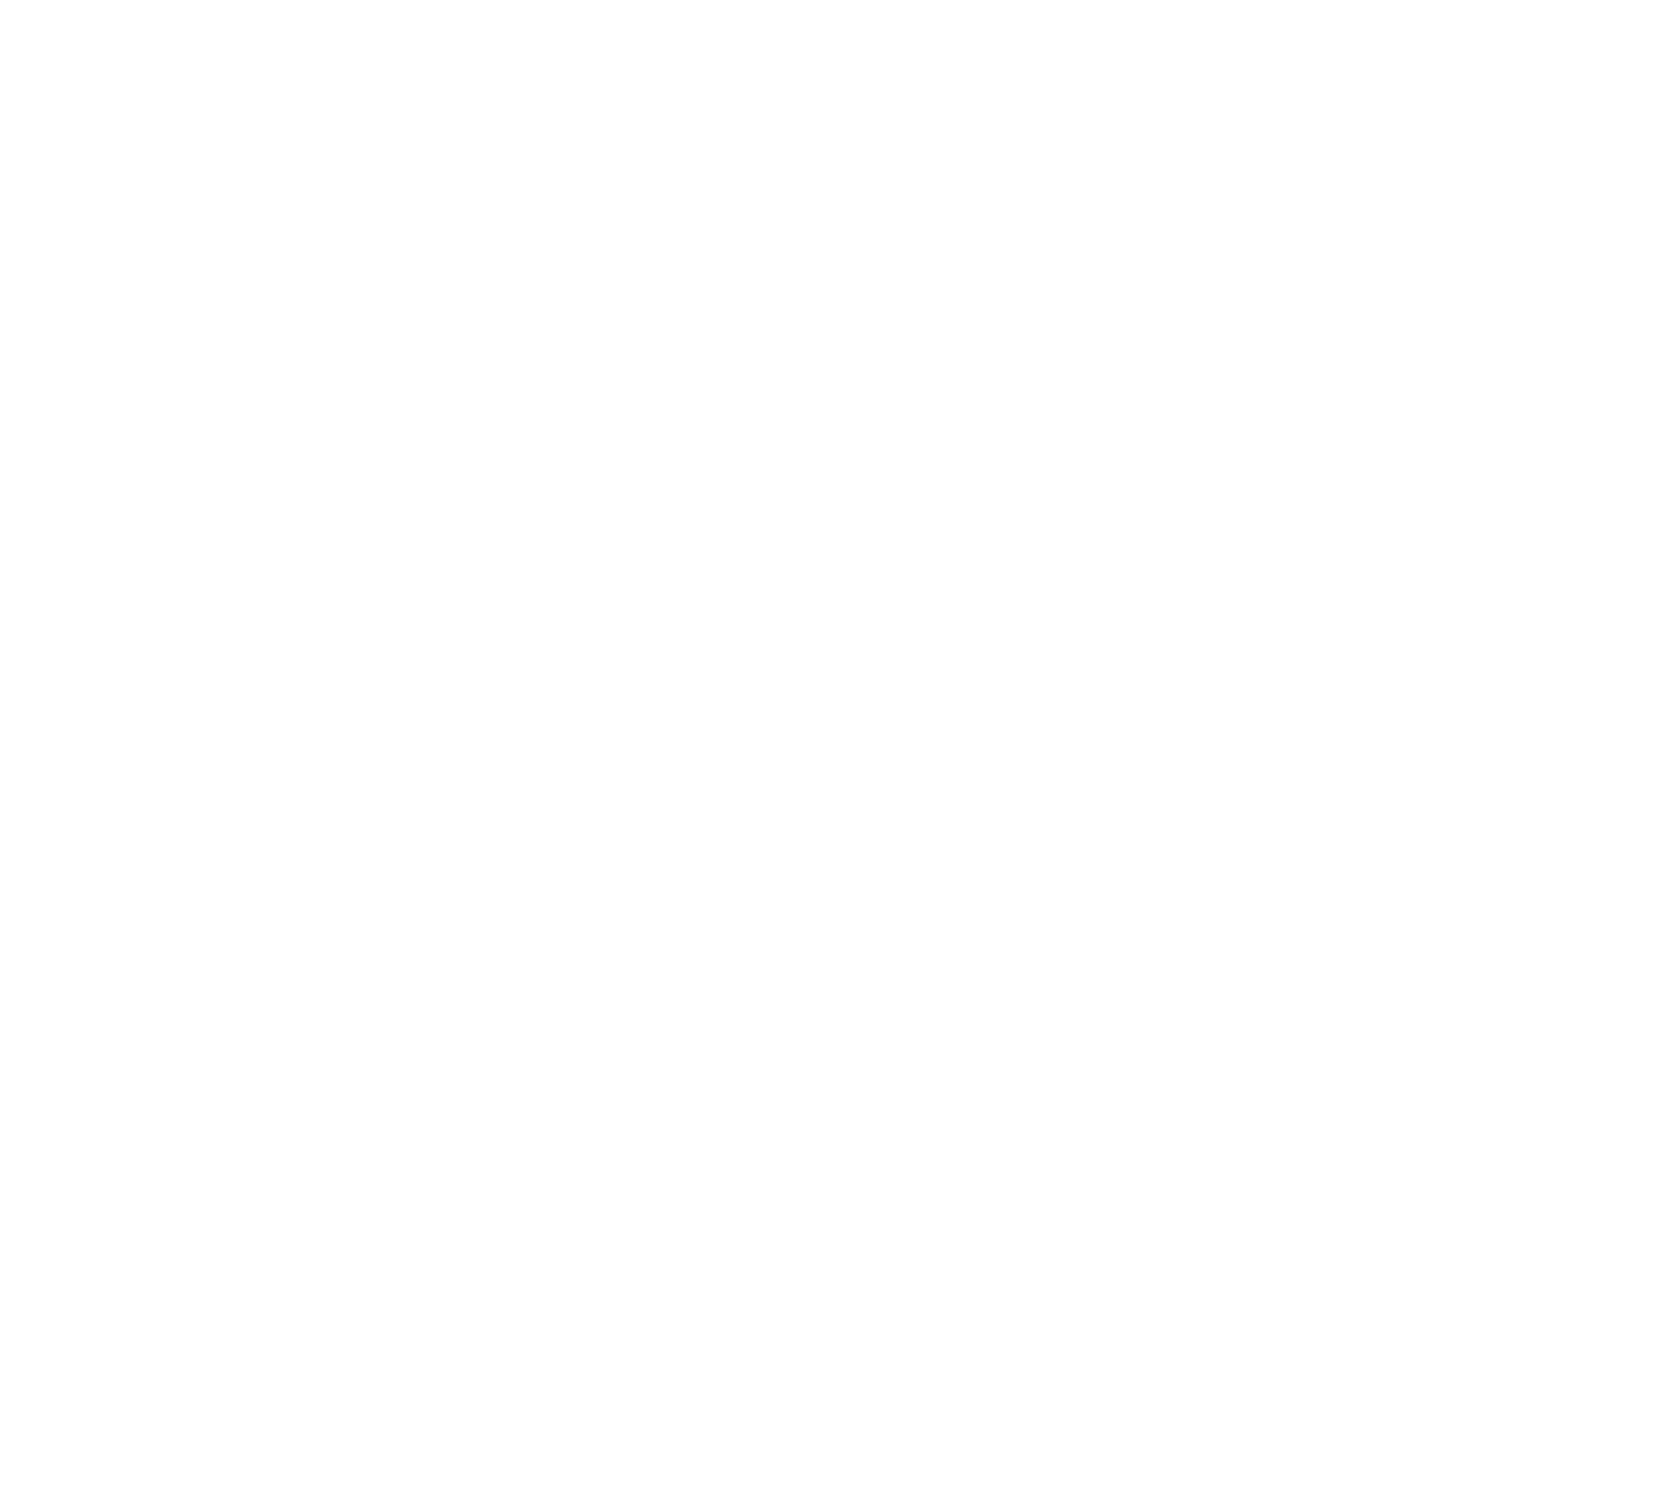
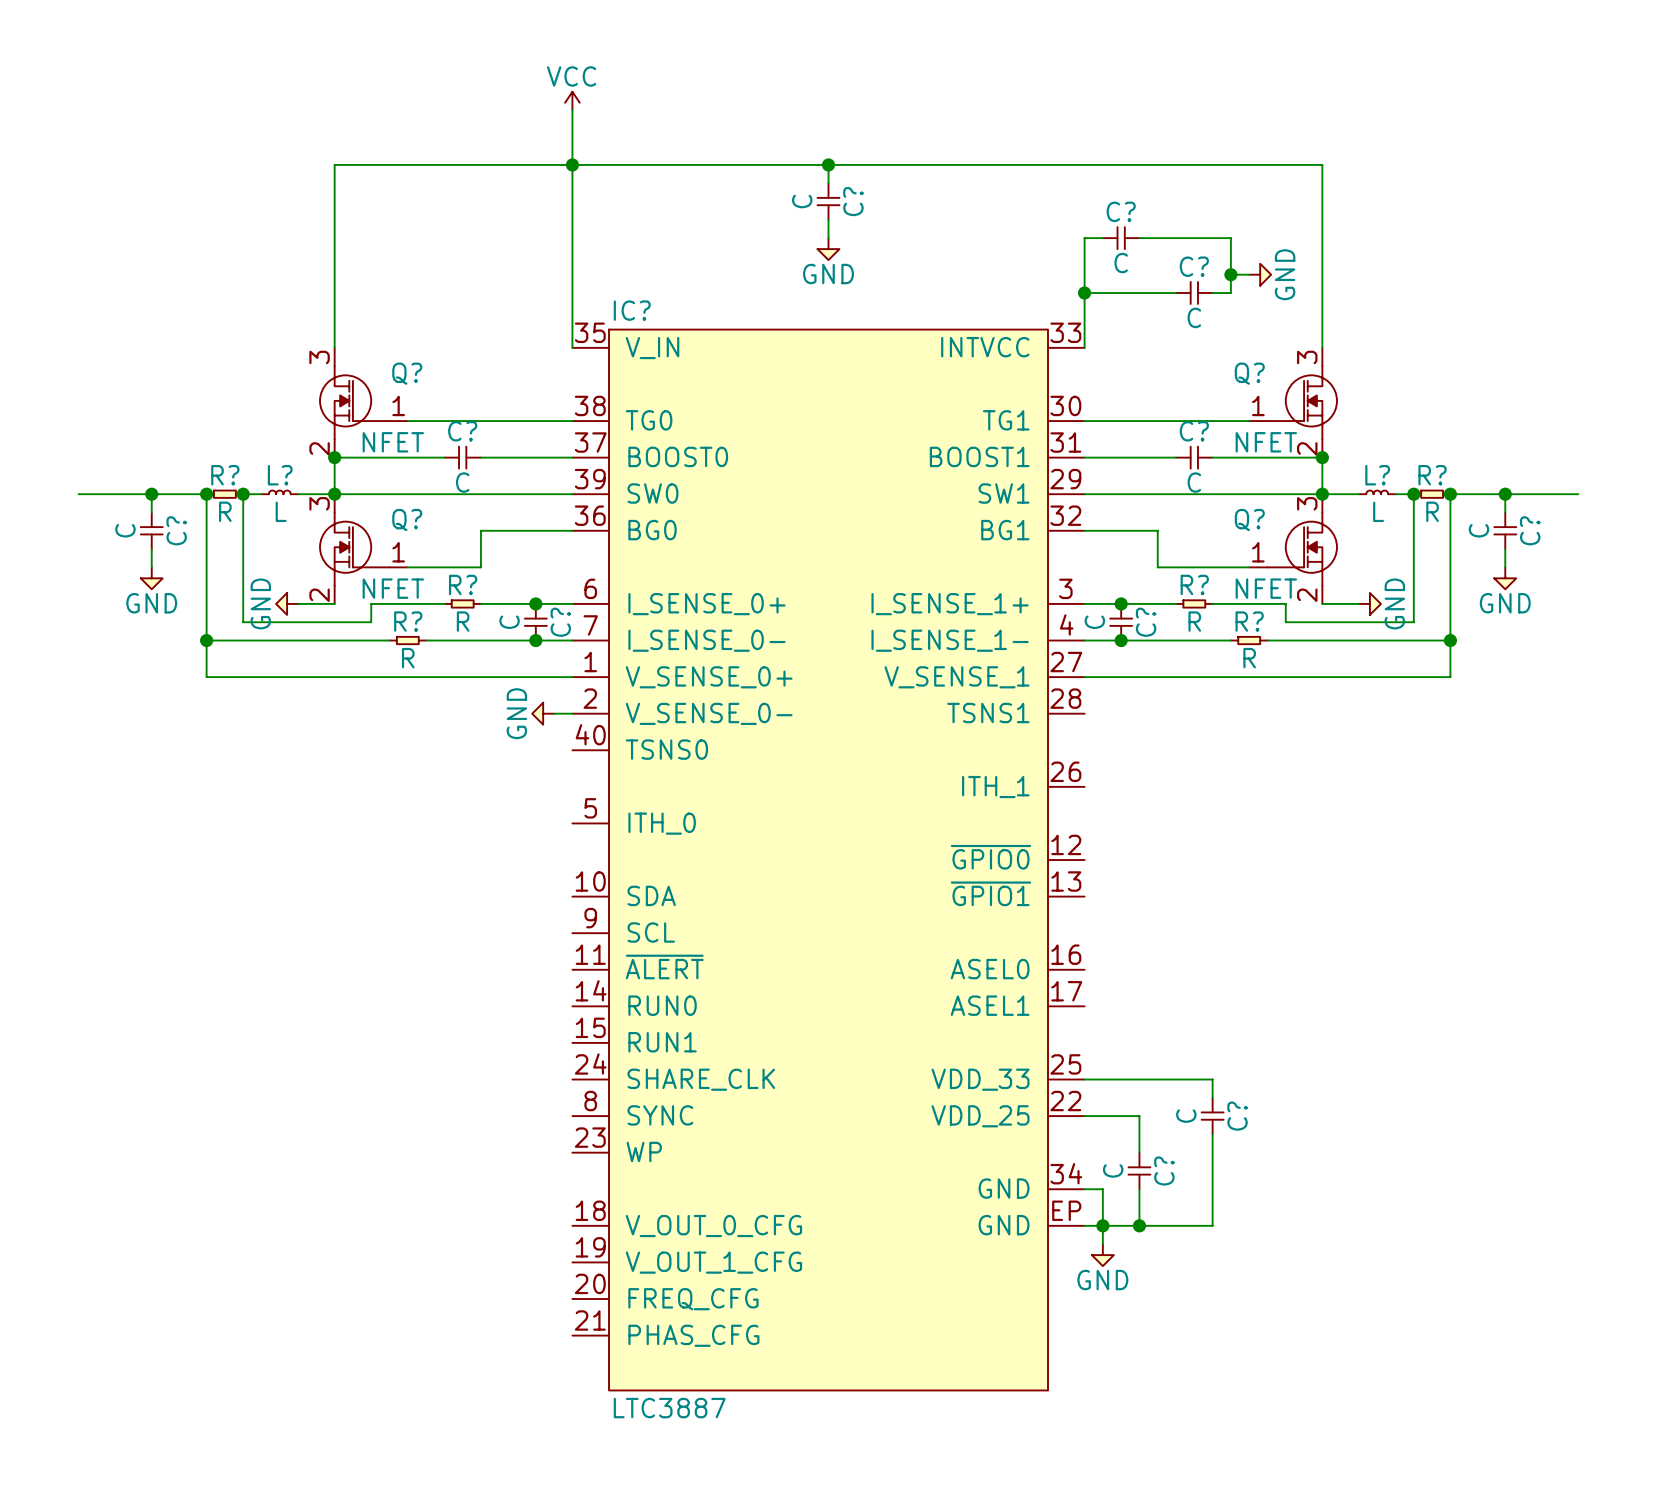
power symbol: none -> VCC (572, 100)
wire: none -> (572, 110) (572, 347)
junction: none -> (572, 164)
wire: none -> (828, 164) (828, 183)
junction: none -> (828, 164)
C?: none -> C (828, 201)
wire: none -> (828, 219) (828, 238)
wire: none -> (1102, 238) (1084, 238) (1084, 347)
C?: none -> C (1121, 238)
wire: none -> (1139, 238) (1230, 238) (1230, 293) (1212, 293)
power symbol: none -> GND (828, 249)
wire: none -> (1230, 274) (1249, 274)
junction: none -> (1230, 274)
power symbol: none -> GND (1260, 274)
wire: none -> (1084, 293) (1176, 293)
junction: none -> (1084, 293)
C?: none -> C (1194, 293)
wire: none -> (334, 347) (334, 164) (1322, 164) (1322, 347)
Q?: none -> NFET (363, 402)
Q?: none -> NFET (1293, 402)
wire: none -> (407, 421) (572, 421)
wire: none -> (1084, 421) (1249, 421)
junction: none -> (334, 457)
wire: none -> (444, 457) (334, 457) (334, 494)
C?: none -> C (462, 457)
wire: none -> (480, 457) (572, 457)
wire: none -> (1084, 457) (1176, 457)
C?: none -> C (1194, 457)
wire: none -> (1212, 457) (1322, 457) (1322, 494)
junction: none -> (1322, 457)
L?: none -> L (279, 492)
L?: none -> L (1377, 492)
wire: none -> (78, 494) (206, 494) (206, 677) (572, 677)
wire: none -> (151, 494) (151, 512)
junction: none -> (151, 494)
junction: none -> (206, 494)
R?: none -> R (224, 494)
junction: none -> (243, 494)
wire: none -> (261, 494) (243, 494) (243, 622) (371, 622) (371, 603) (444, 603)
wire: none -> (298, 494) (572, 494)
junction: none -> (334, 494)
wire: none -> (1084, 494) (1358, 494)
junction: none -> (1322, 494)
wire: none -> (1395, 494) (1413, 494) (1413, 622) (1285, 622) (1285, 603) (1212, 603)
junction: none -> (1413, 494)
R?: none -> R (1432, 494)
junction: none -> (1450, 494)
wire: none -> (1505, 494) (1505, 512)
junction: none -> (1505, 494)
wire: none -> (1578, 494) (1450, 494) (1450, 677) (1084, 677)
C?: none -> C (151, 530)
wire: none -> (572, 530) (480, 530) (480, 567) (407, 567)
wire: none -> (1084, 530) (1157, 530) (1157, 567) (1249, 567)
C?: none -> C (1505, 530)
wire: none -> (151, 549) (151, 567)
Q?: none -> NFET (363, 549)
Q?: none -> NFET (1293, 549)
wire: none -> (1505, 549) (1505, 567)
power symbol: none -> GND (151, 578)
power symbol: none -> GND (1505, 578)
power symbol: none -> GND (287, 603)
wire: none -> (298, 603) (334, 603)
R?: none -> R (462, 603)
wire: none -> (480, 603) (572, 603)
junction: none -> (535, 603)
wire: none -> (1084, 603) (1176, 603)
junction: none -> (1121, 603)
R?: none -> R (1194, 603)
wire: none -> (1322, 603) (1358, 603)
power symbol: none -> GND (1369, 603)
C?: none -> C (535, 622)
C?: none -> C (1121, 622)
wire: none -> (206, 640) (389, 640)
junction: none -> (206, 640)
R?: none -> R (407, 640)
wire: none -> (426, 640) (572, 640)
junction: none -> (535, 640)
wire: none -> (1084, 640) (1230, 640)
junction: none -> (1121, 640)
R?: none -> R (1249, 640)
wire: none -> (1267, 640) (1450, 640)
junction: none -> (1450, 640)
power symbol: none -> GND (543, 713)
wire: none -> (554, 713) (572, 713)
IC?: none -> LTC3887 (828, 860)
wire: none -> (1084, 1079) (1212, 1079) (1212, 1097)
wire: none -> (1084, 1116) (1139, 1116) (1139, 1152)
C?: none -> C (1212, 1116)
wire: none -> (1212, 1134) (1212, 1225) (1084, 1225)
C?: none -> C (1139, 1170)
wire: none -> (1084, 1189) (1102, 1189) (1102, 1244)
wire: none -> (1139, 1189) (1139, 1225)
junction: none -> (1102, 1225)
junction: none -> (1139, 1225)
power symbol: none -> GND (1102, 1255)

